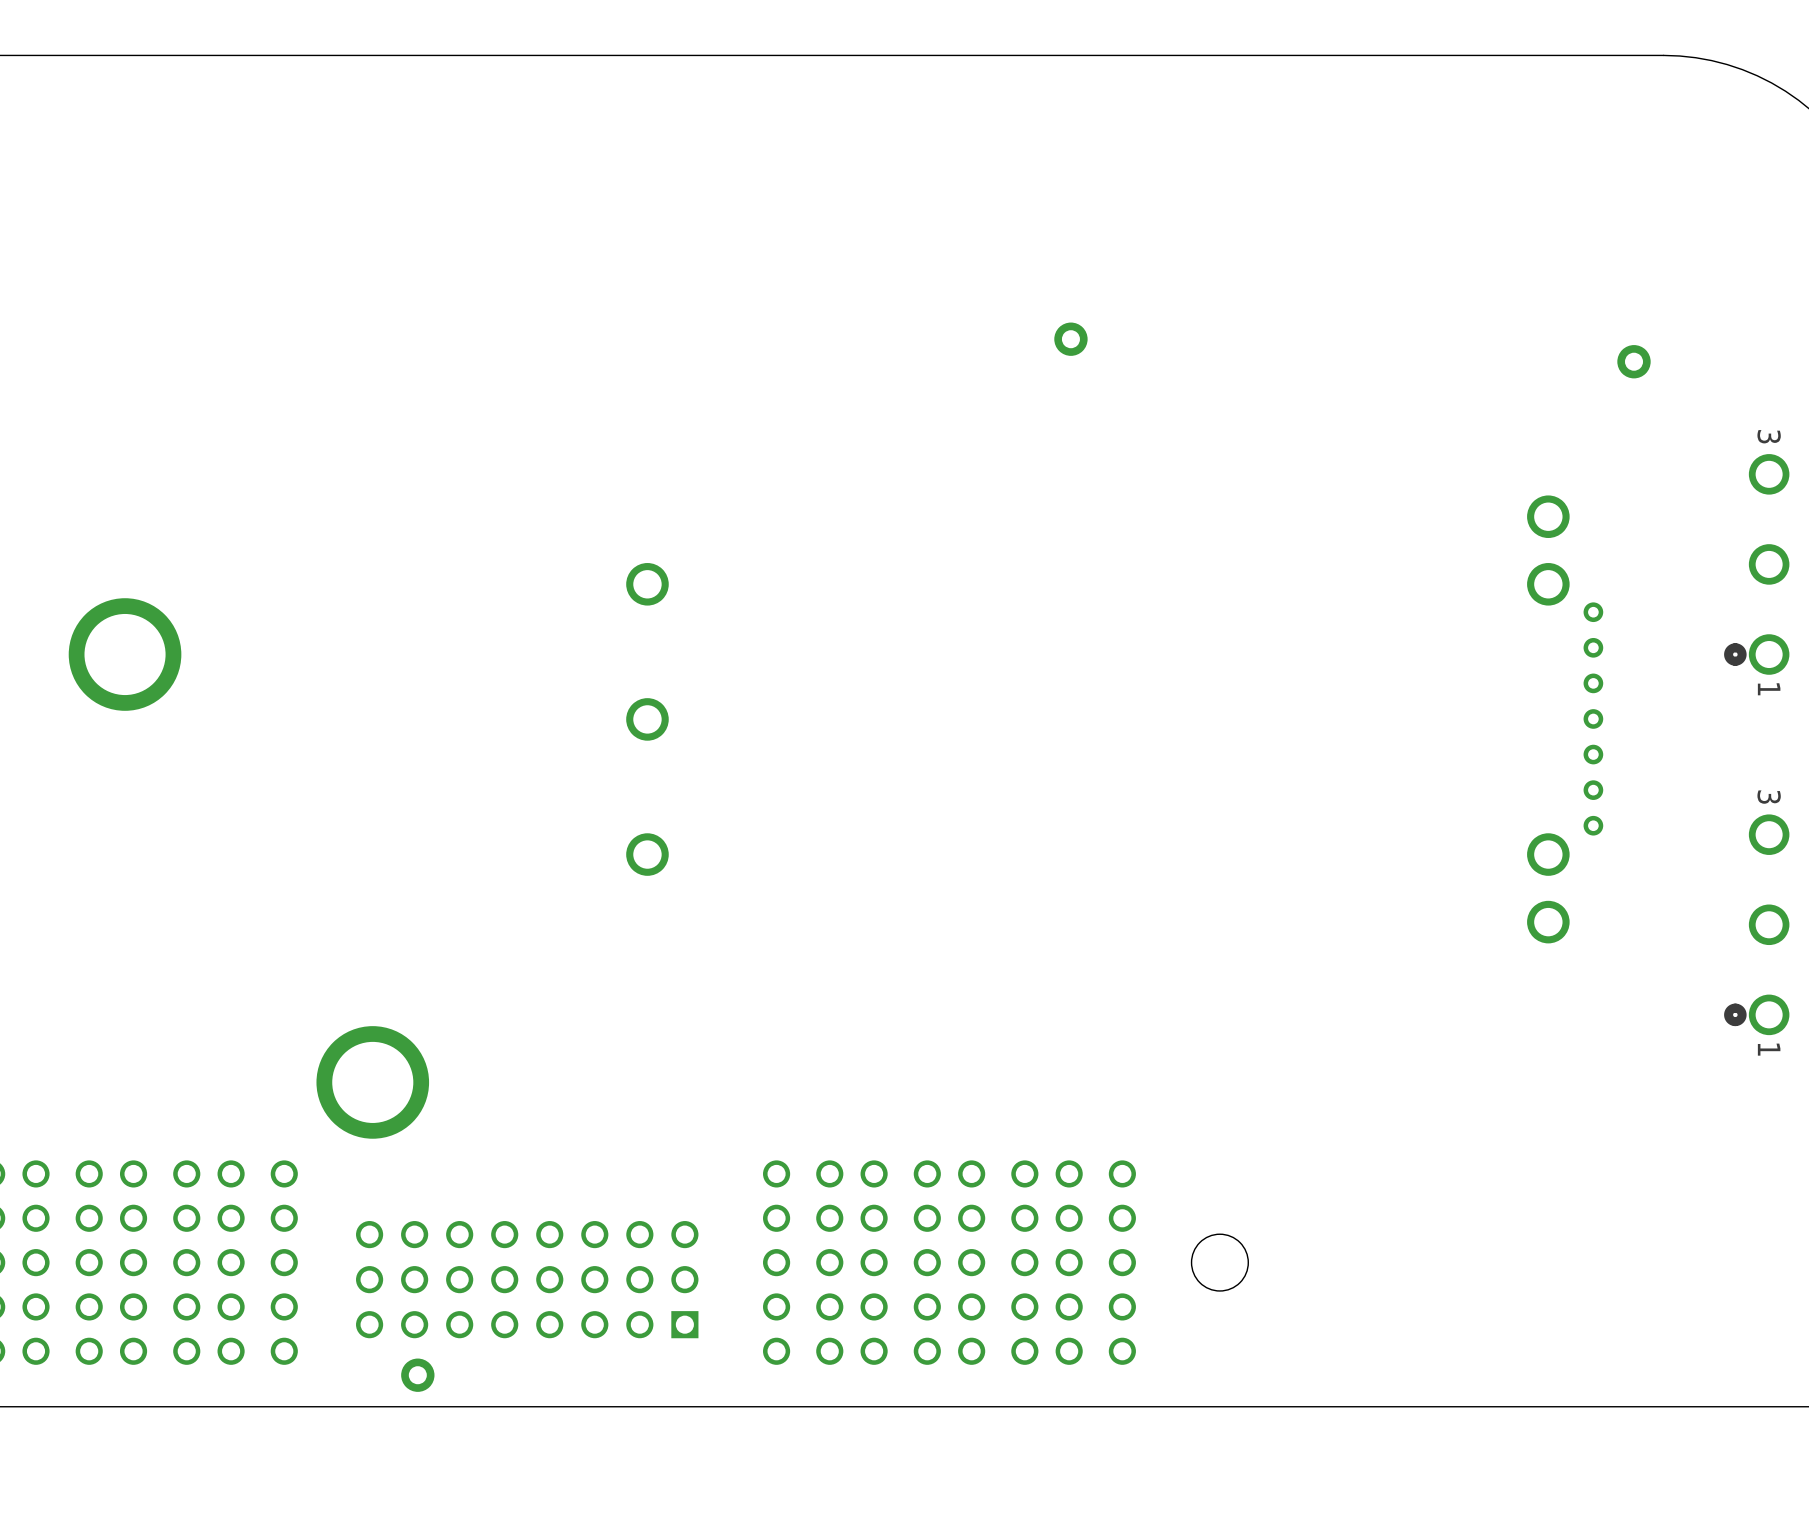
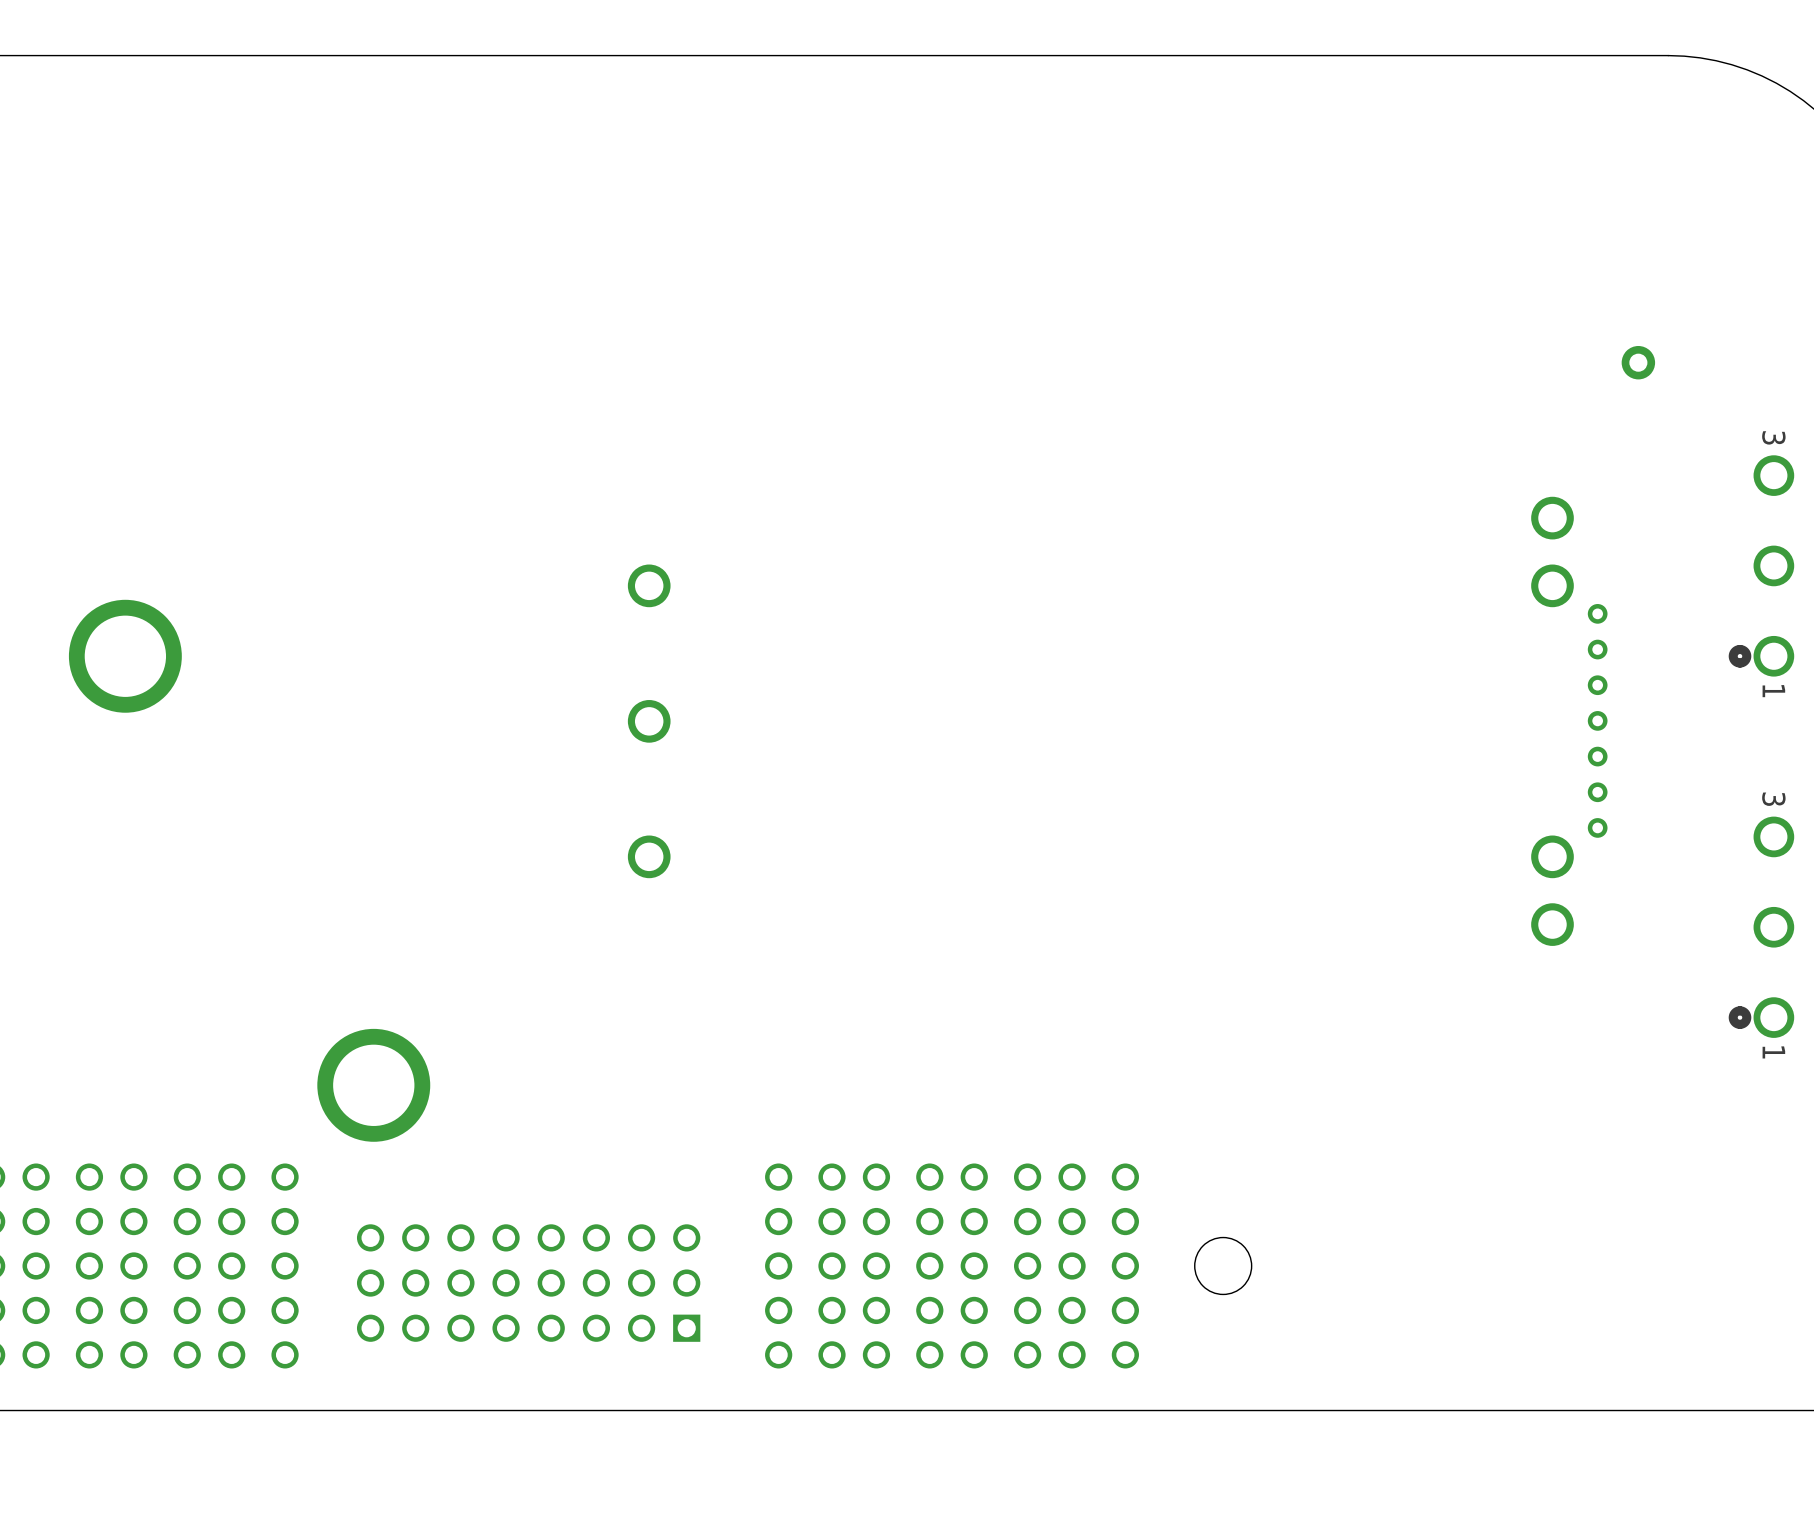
part: (1070, 339) -> none
part: (417, 1375) -> none

